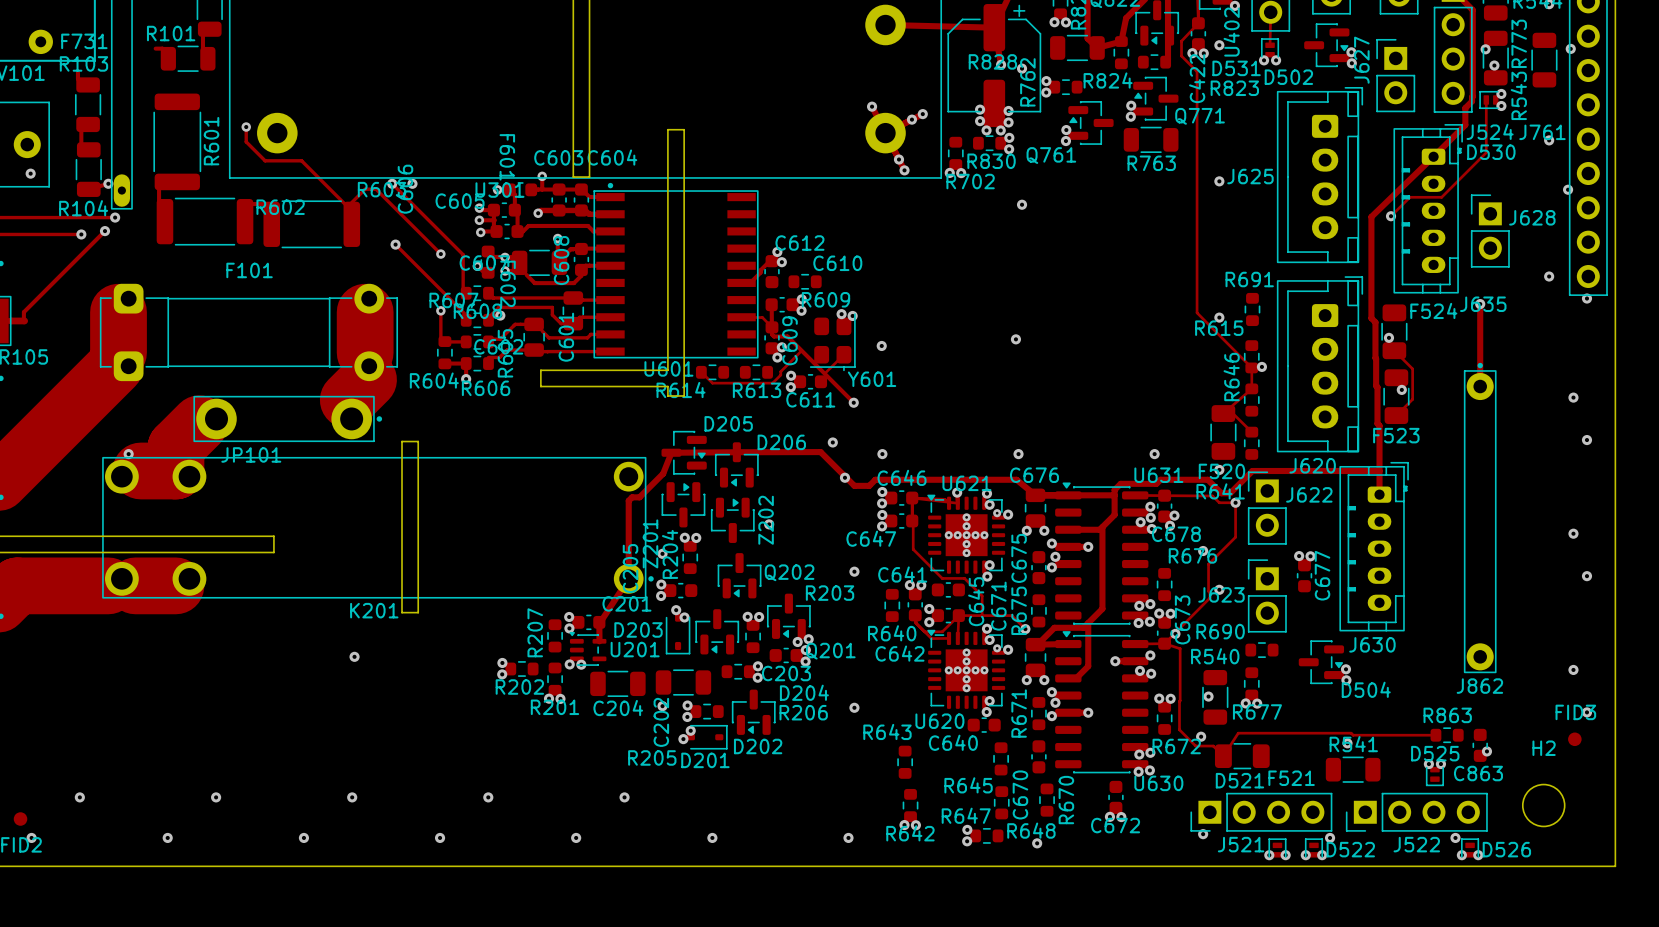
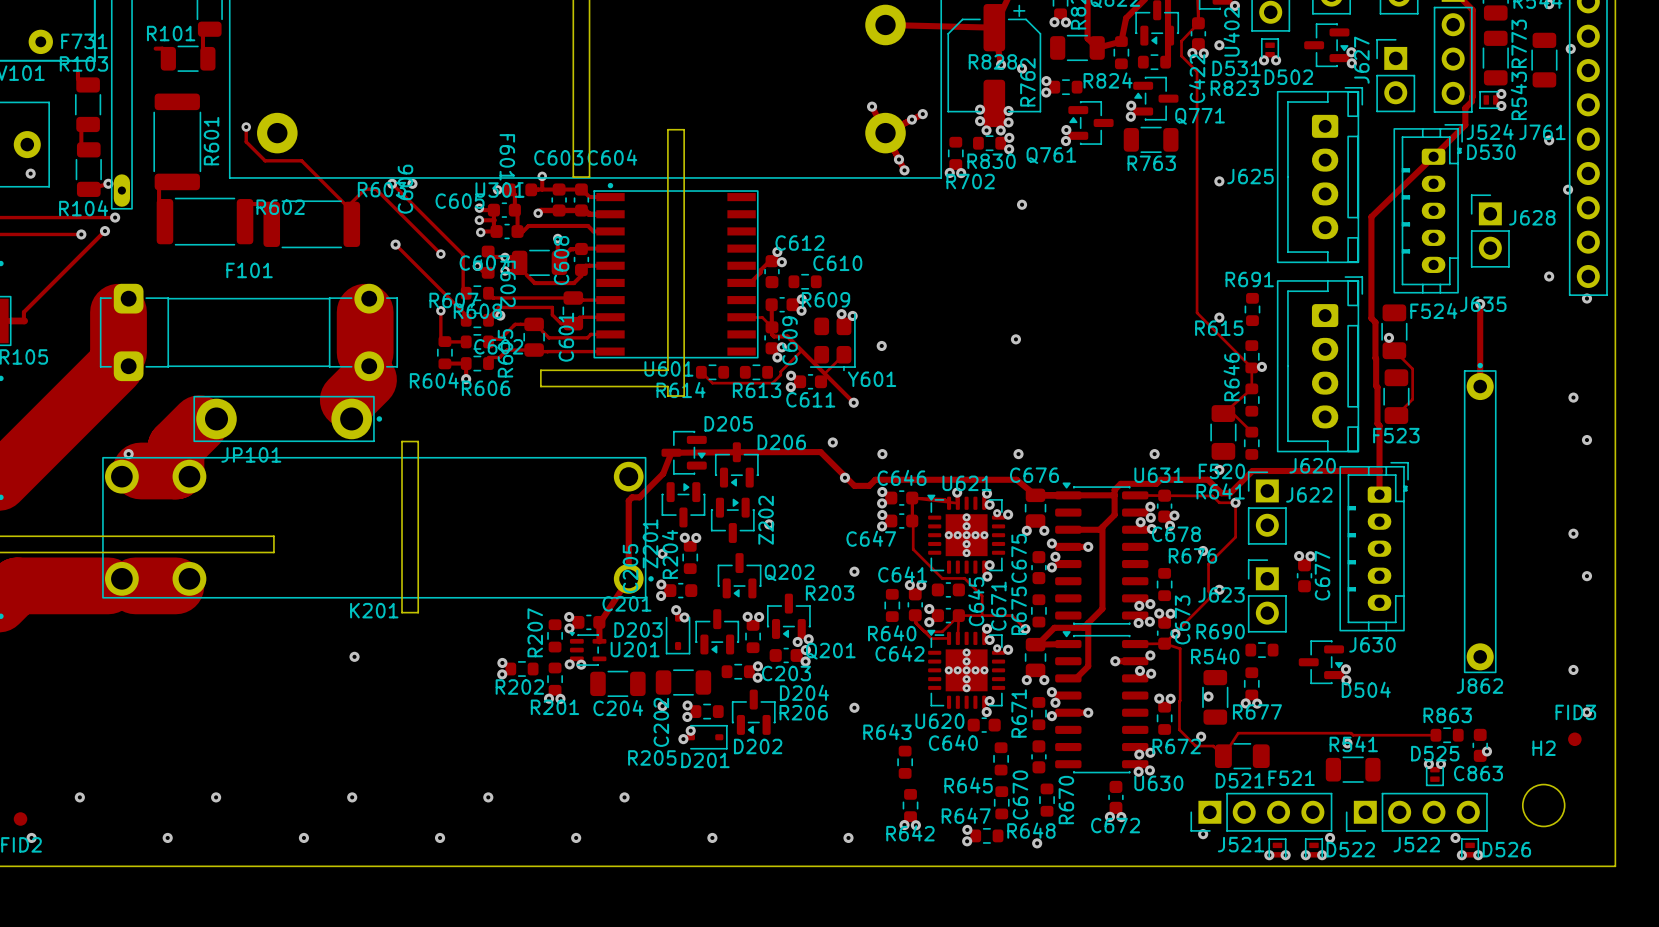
track: (1270, 12) (1270, 45) -> none
via: (1485, 49) -> none
via: (1494, 65) -> none
track: (1486, 99) (1486, 152) (1441, 197) (1409, 197) (1391, 216) -> none
via: (1391, 216) -> none
via: (1401, 389) -> none

